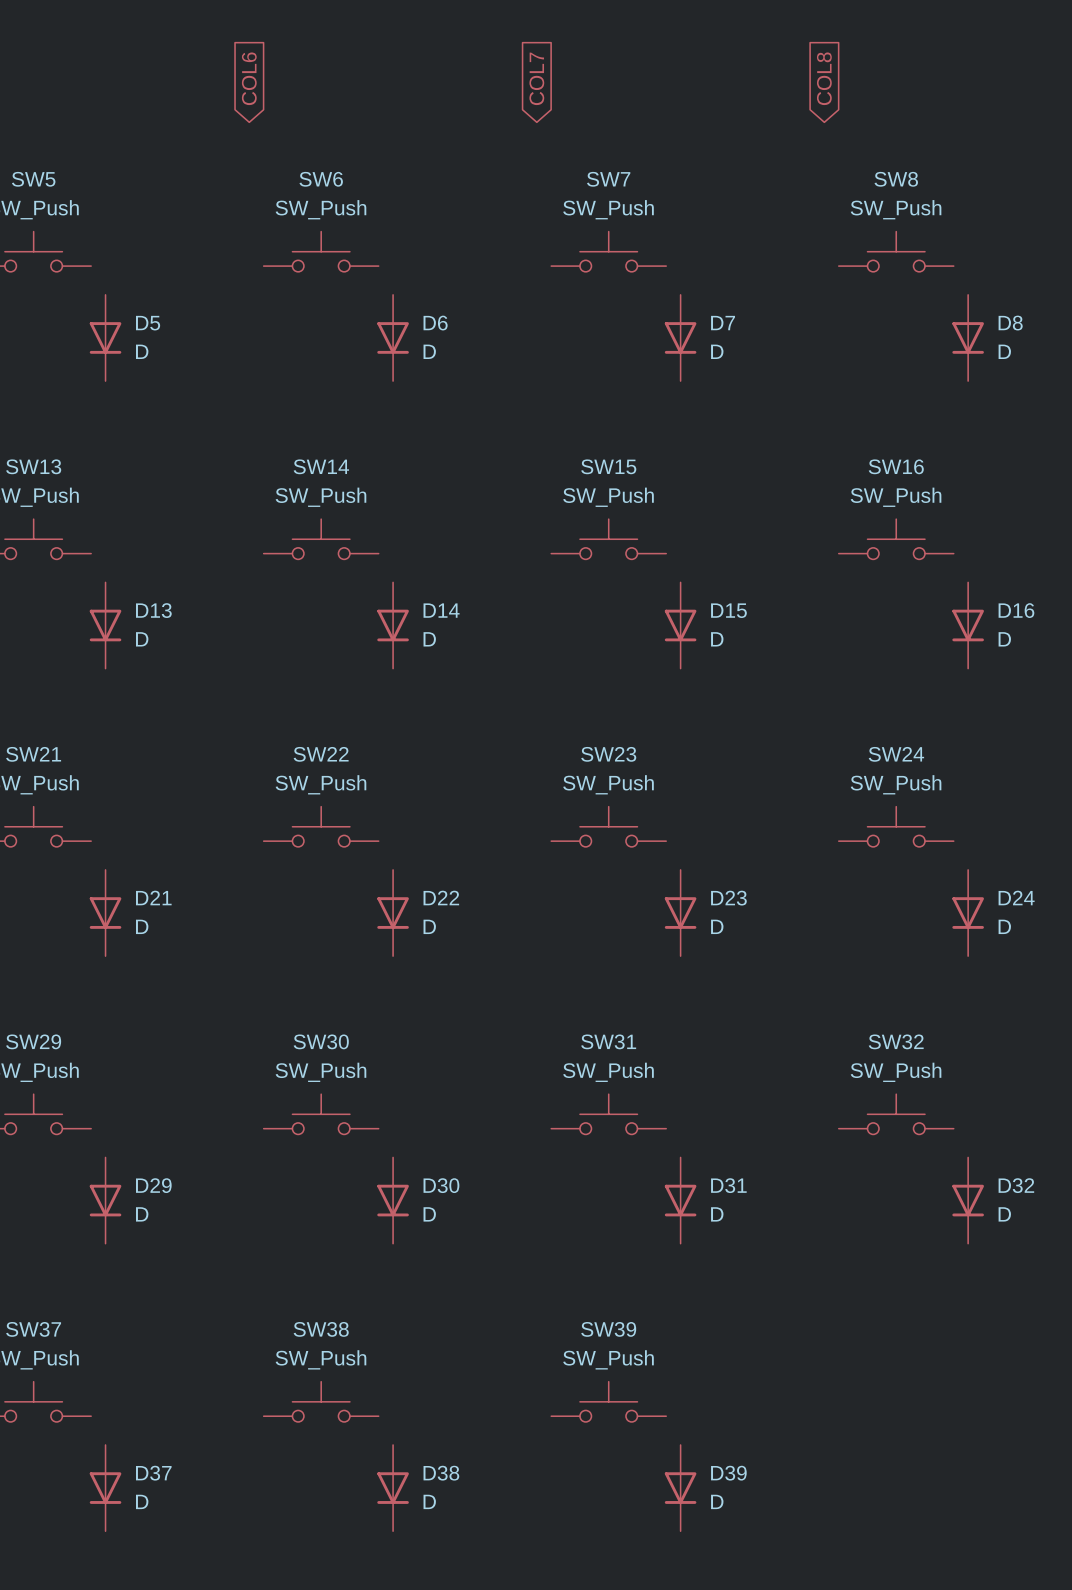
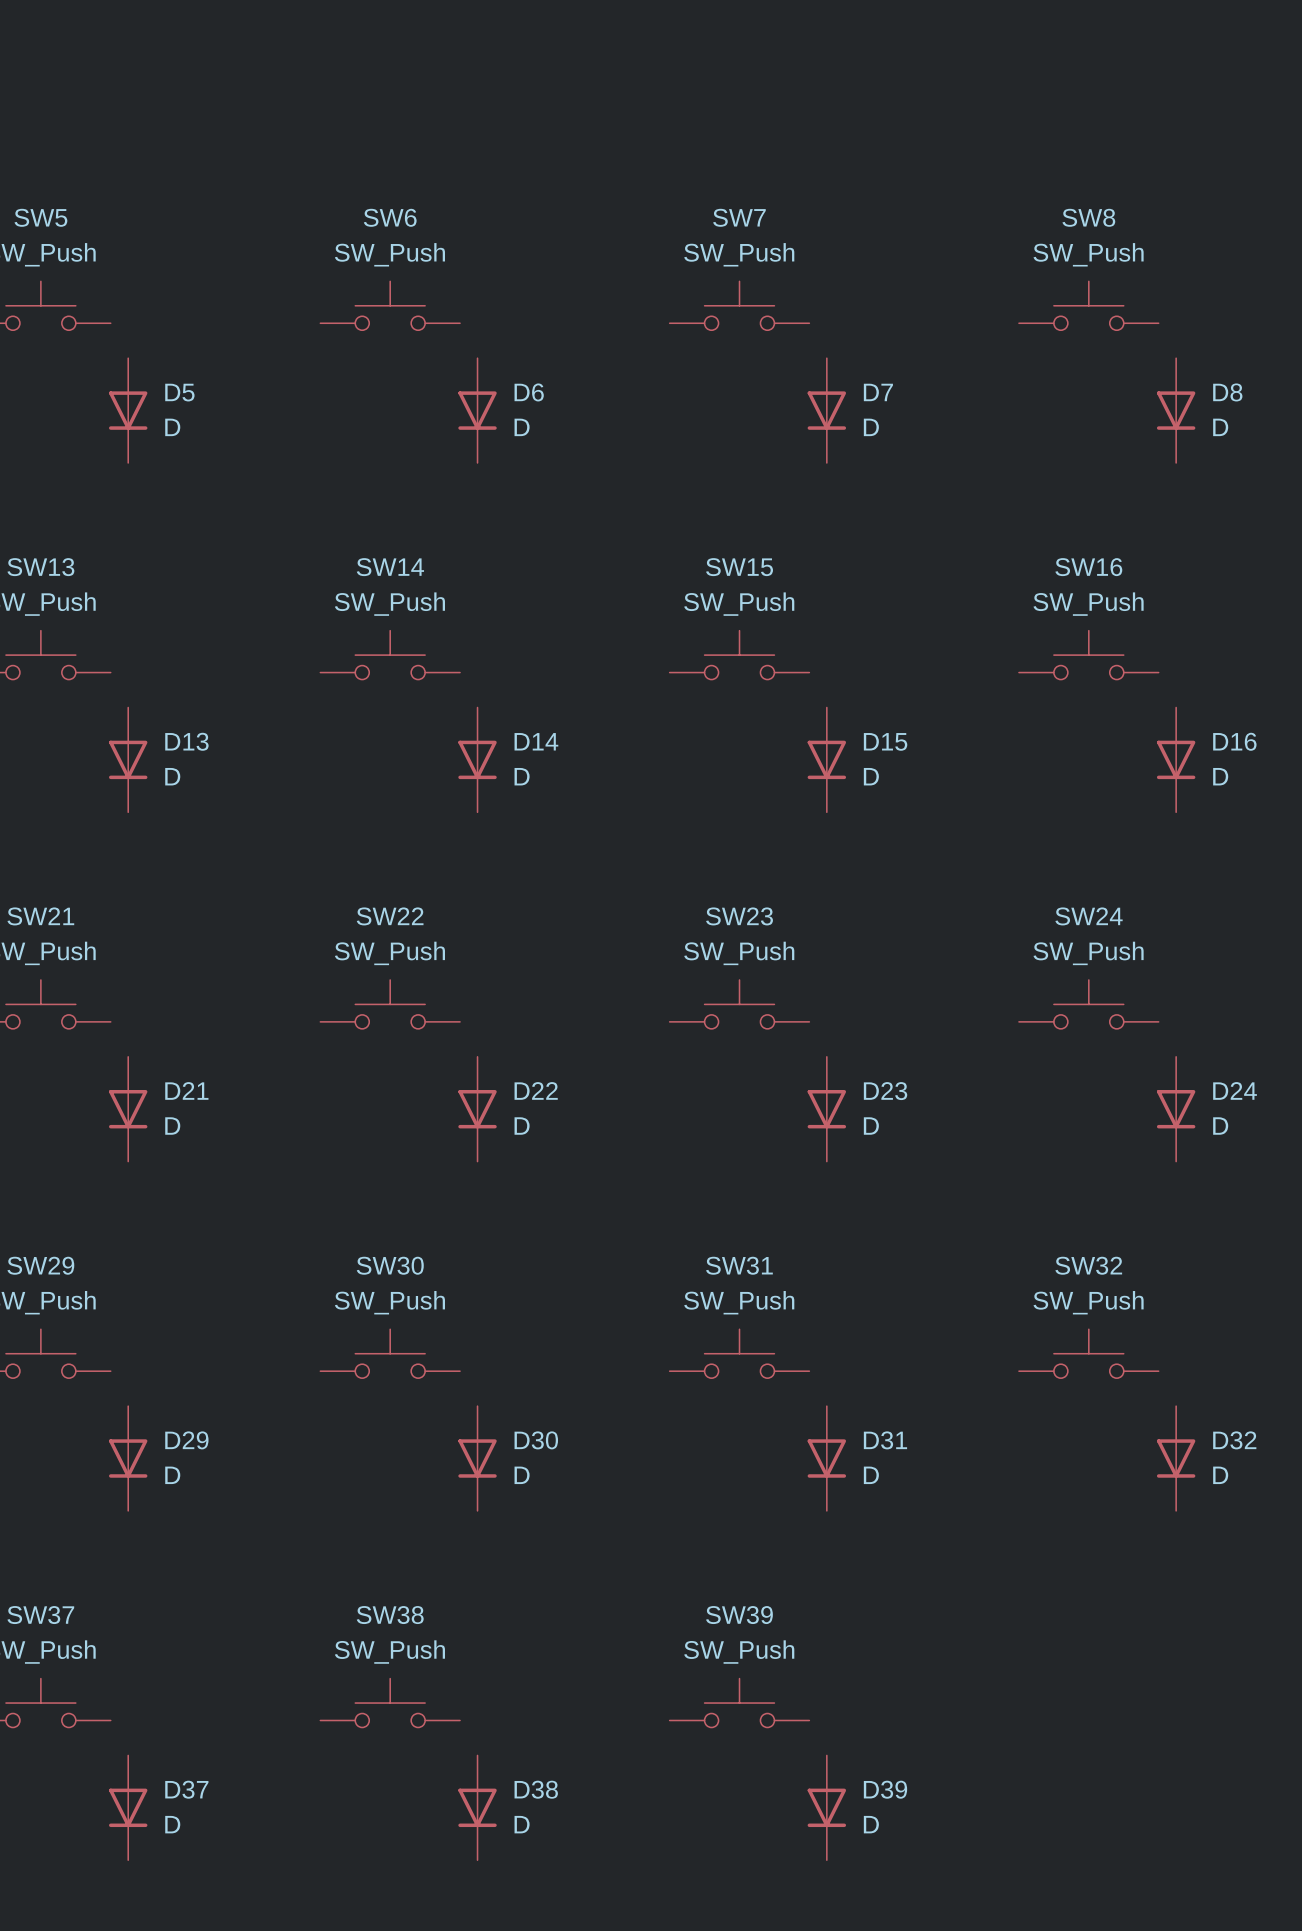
global label: COL6 (249, 78) -> none
global label: COL7 (536, 78) -> none
global label: COL8 (824, 78) -> none

